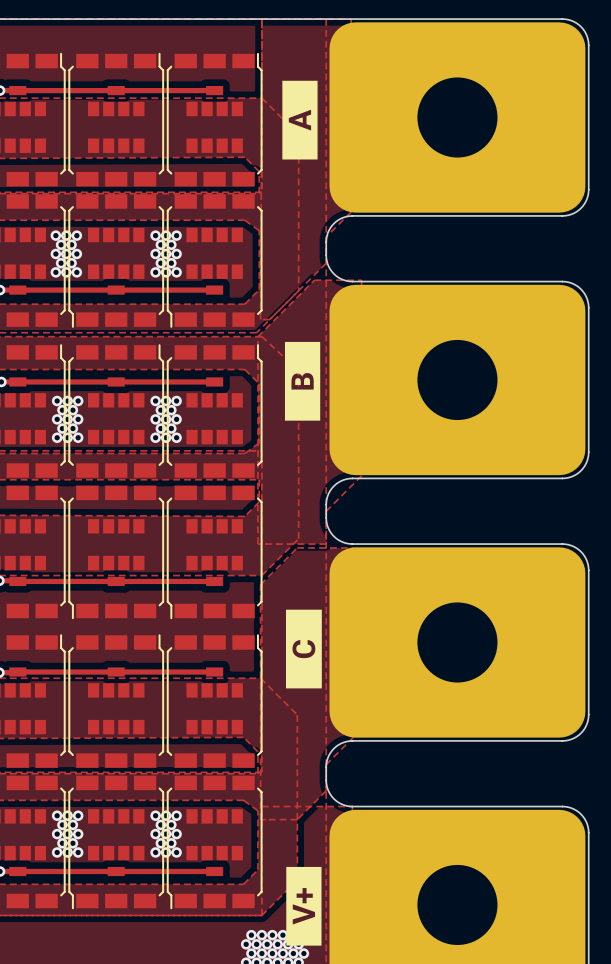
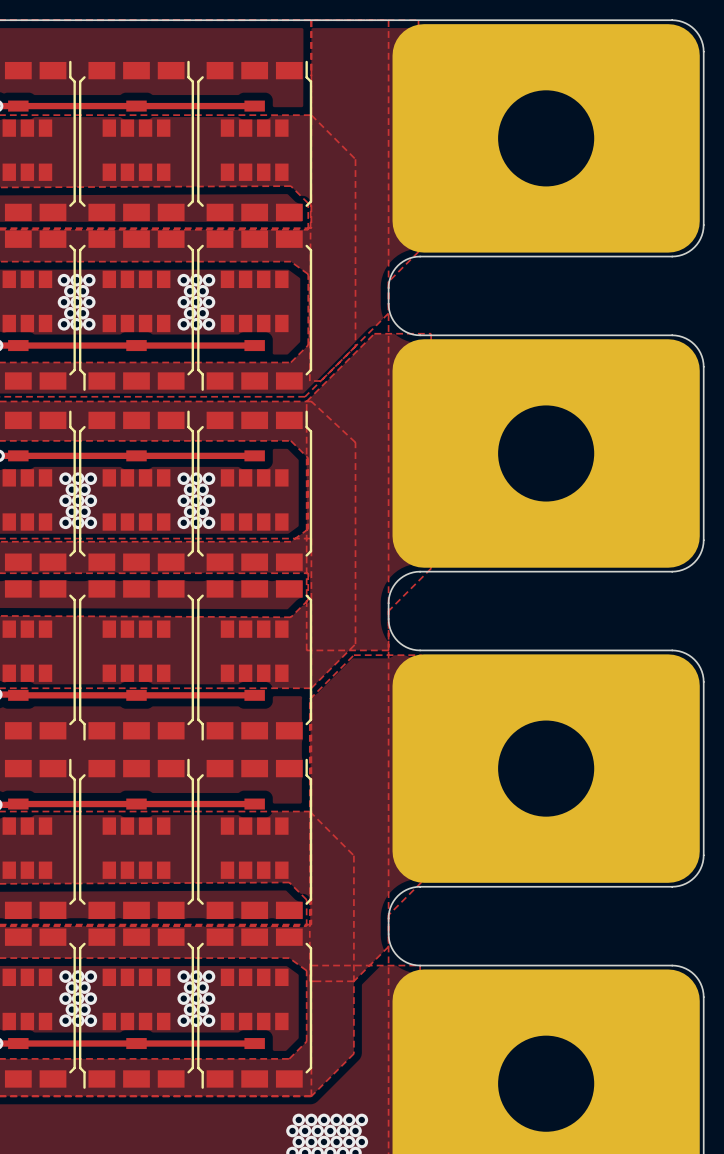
drawing: [282, 80, 318, 160] -> none
drawing: [284, 341, 321, 421] -> none
drawing: [285, 609, 322, 689] -> none
drawing: [286, 866, 322, 946] -> none

